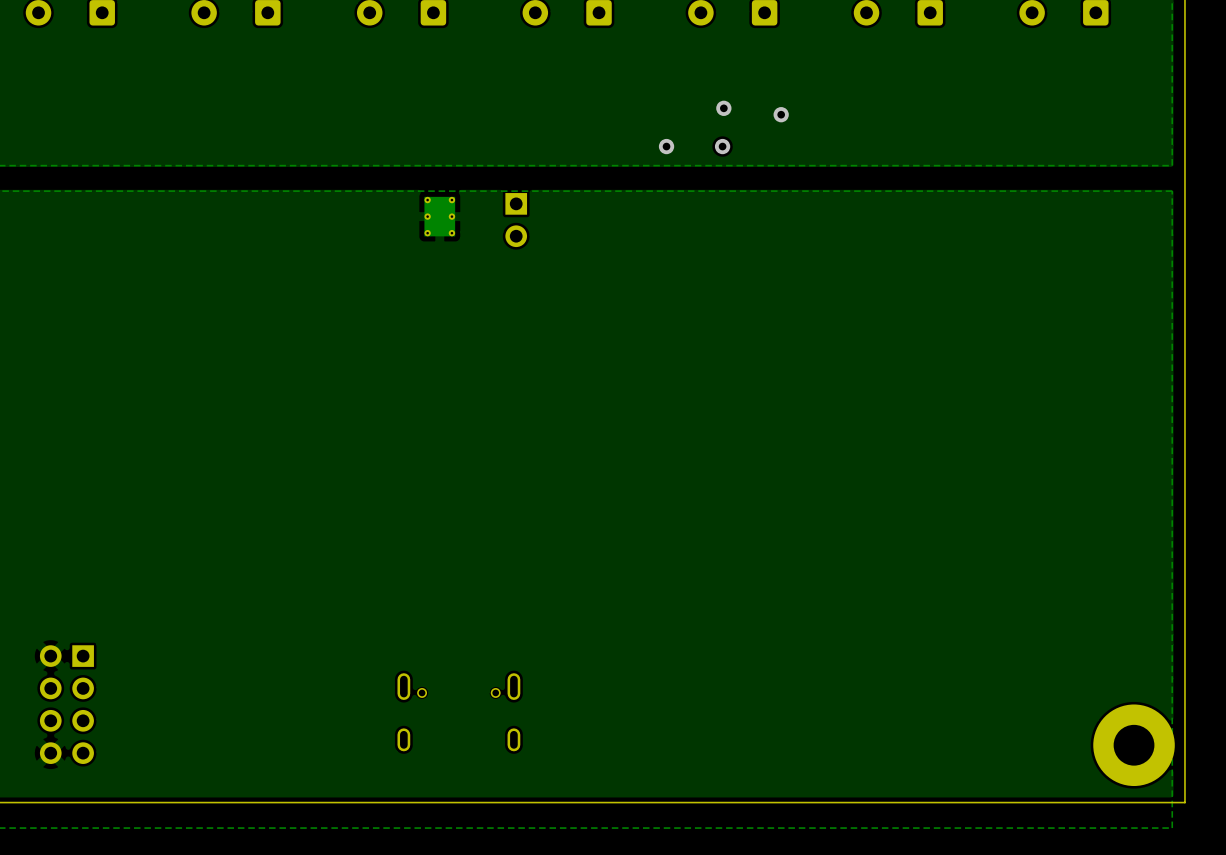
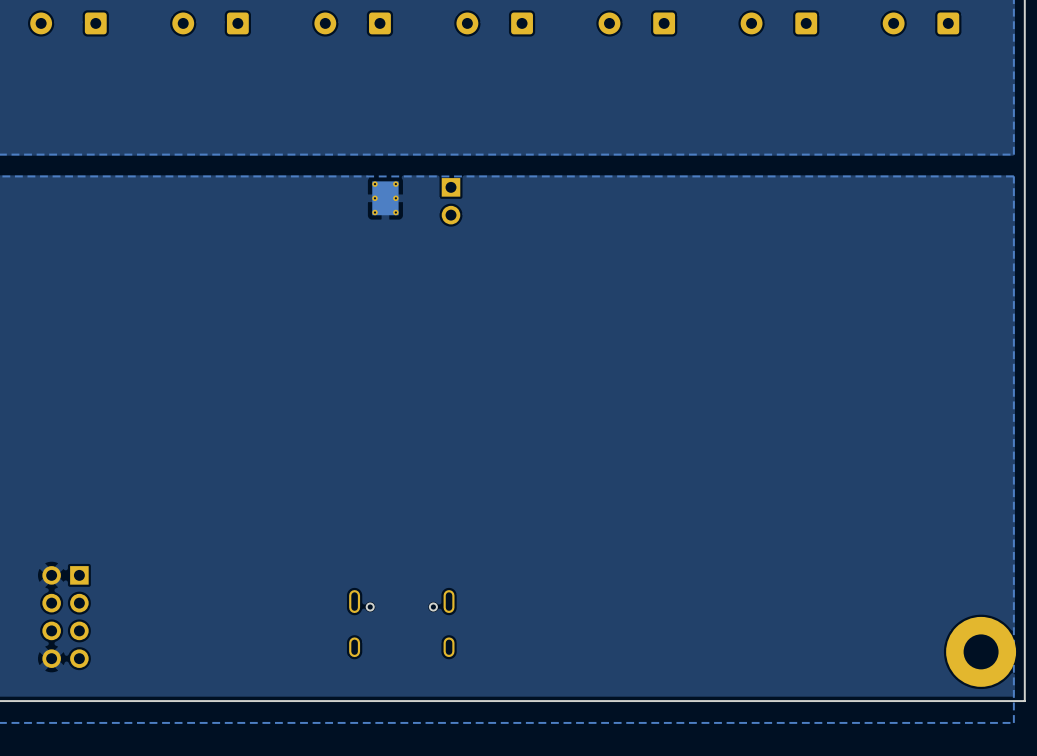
via: (723, 108) -> none
via: (781, 114) -> none
via: (666, 146) -> none
via: (722, 146) -> none

